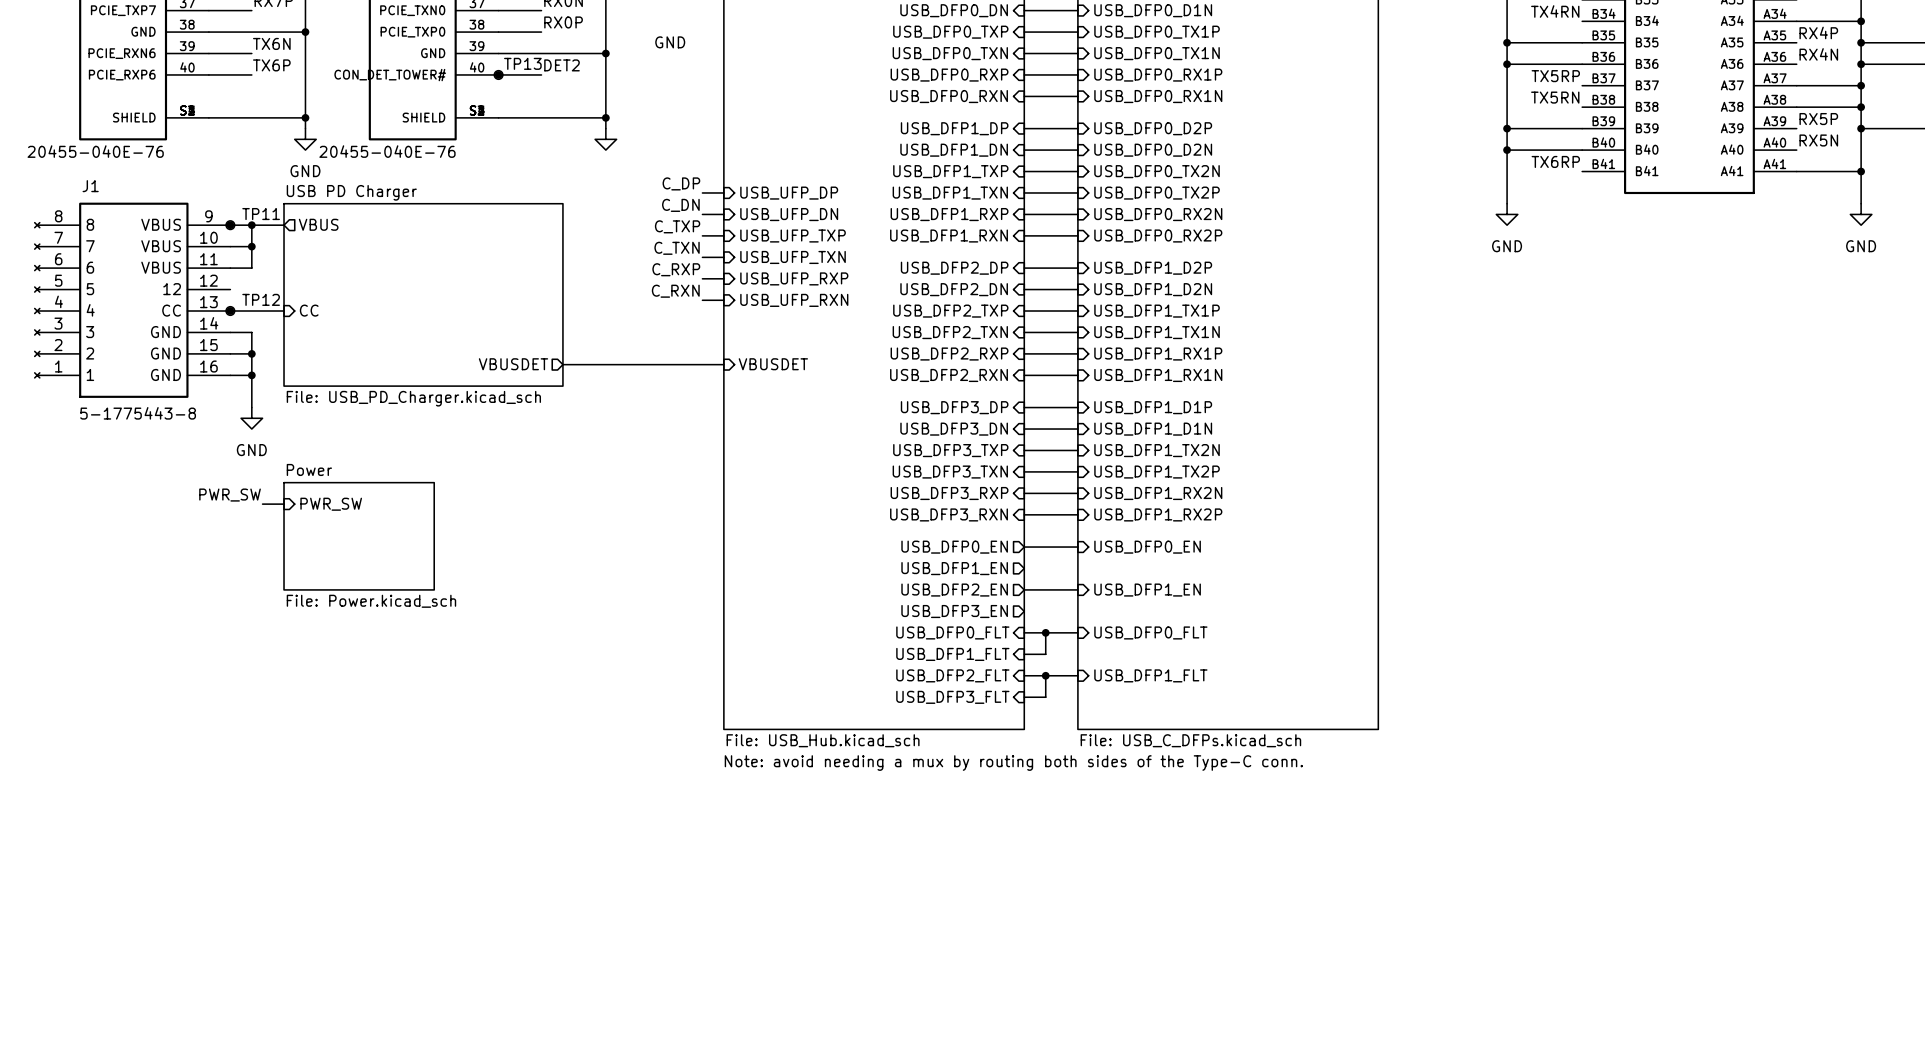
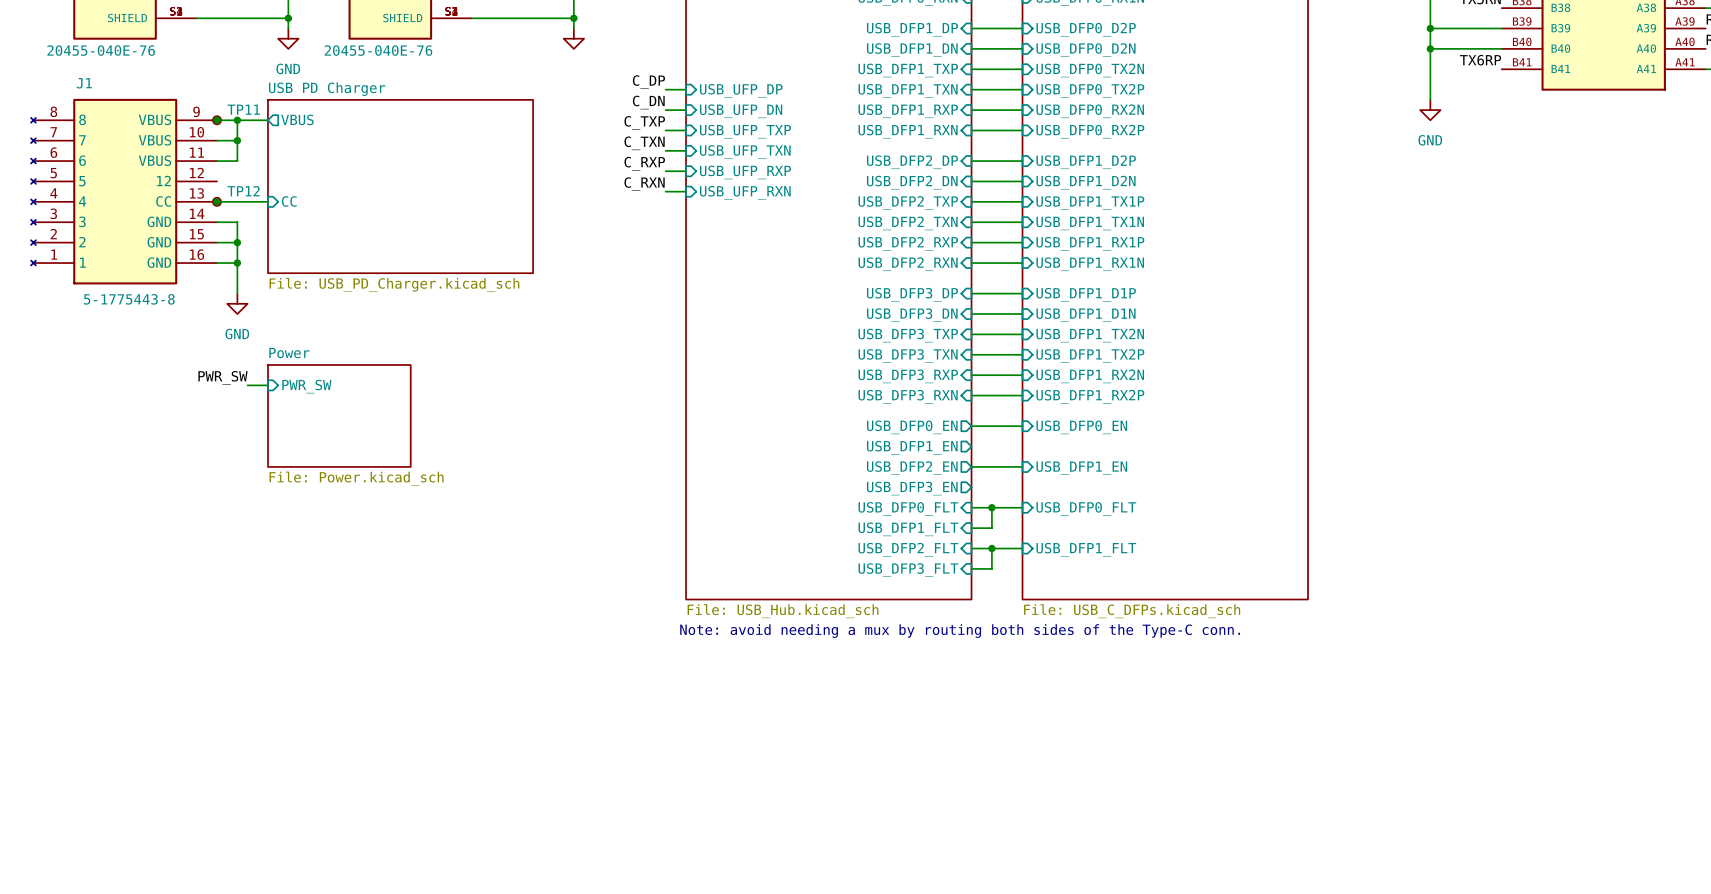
sheet pin: VBUSDET (513, 364) -> none
wire: (562, 364) (723, 364) -> none
sheet pin: VBUSDET (773, 364) -> none

